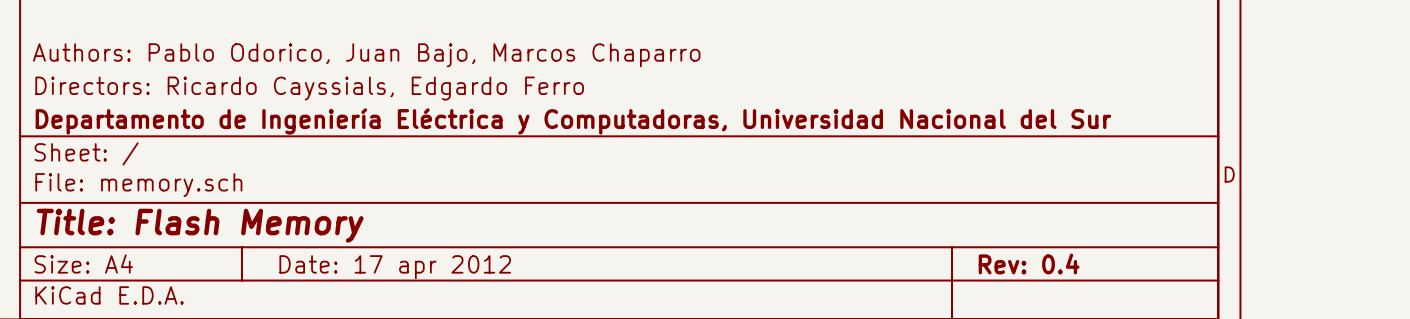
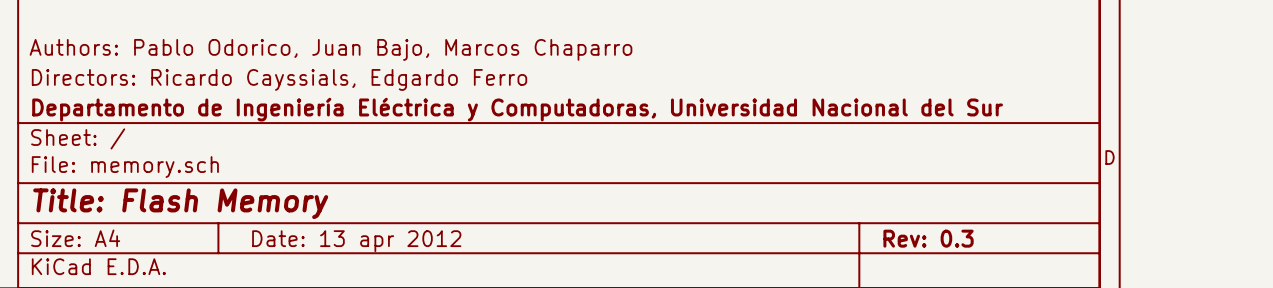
title block: Rev: 0.4 (1029, 264) -> Rev: 0.3 (928, 238)
title block: Date: 17 apr 2012 (395, 267) -> Date: 13 apr 2012 (356, 241)

